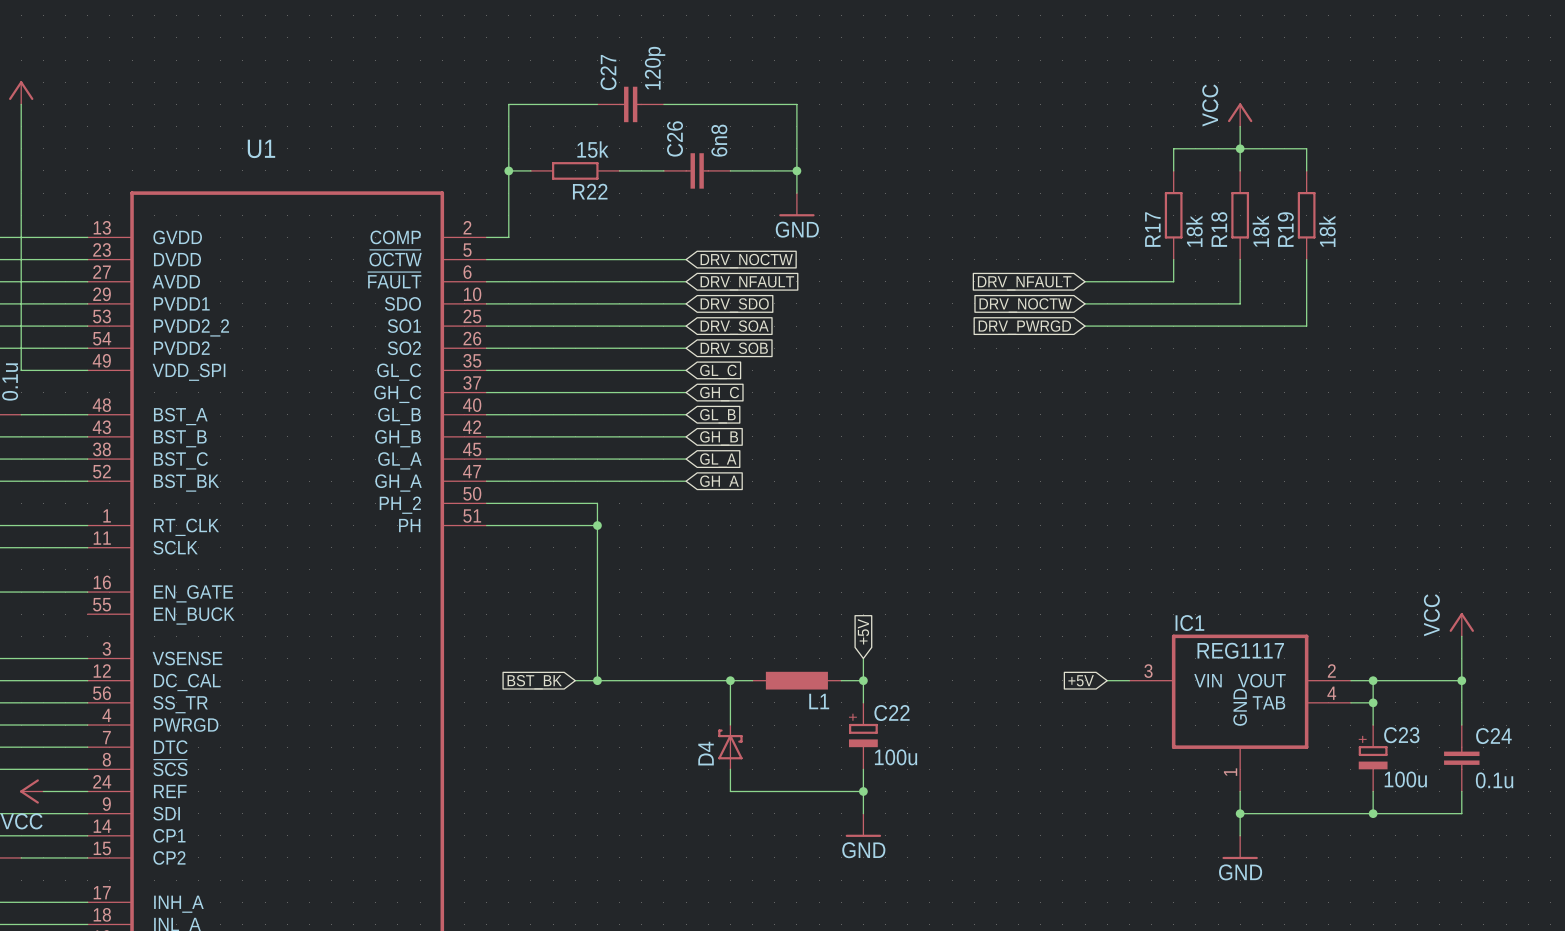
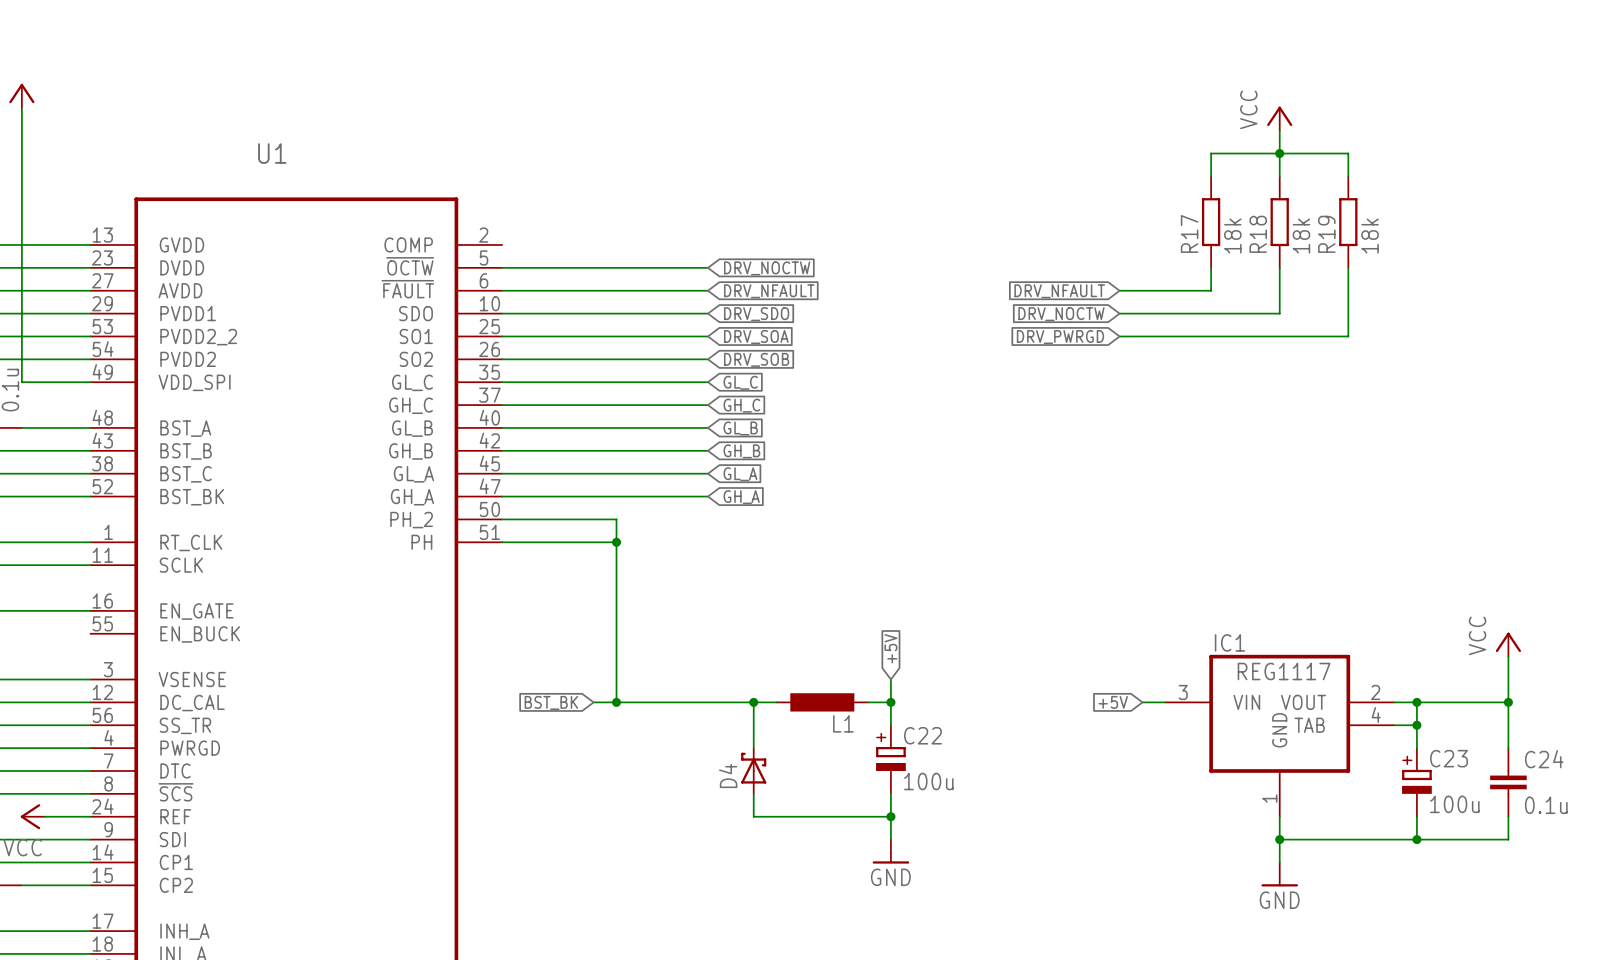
wire: (597, 104) (508, 104) (508, 237) (486, 237) -> none
C27: 120p (630, 104) -> none
wire: (663, 104) (796, 104) (796, 193) -> none
wire: (508, 170) (530, 170) -> none
junction: (508, 170) -> none
R22: 15k (575, 170) -> none
wire: (619, 170) (663, 170) -> none
C26: 6n8 (697, 170) -> none
wire: (730, 170) (796, 170) -> none
junction: (796, 170) -> none
power symbol: GND (796, 204) -> none

